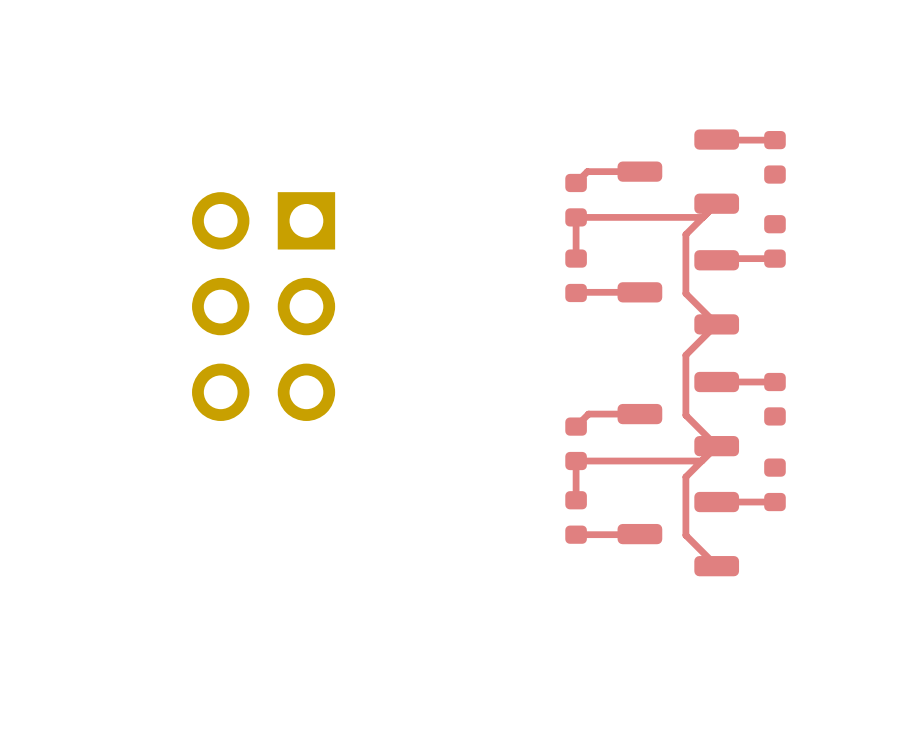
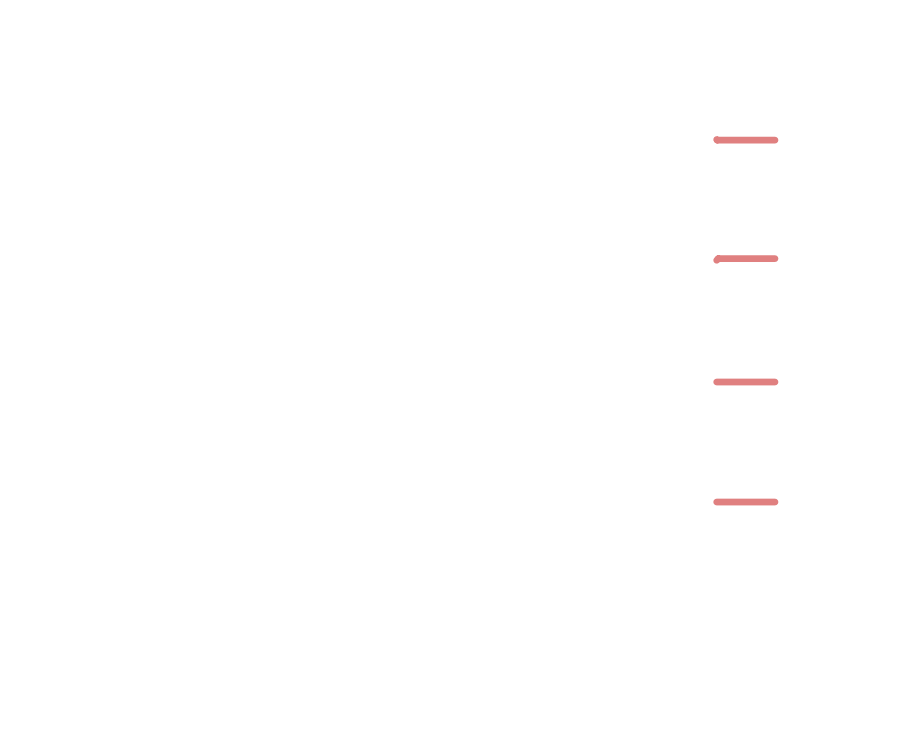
part: (774, 157) -> none
top track: (639, 171) (587, 171) (576, 182) -> none
part: (678, 171) -> none
part: (576, 200) -> none
top track: (716, 203) (685, 234) (685, 293) (716, 324) (685, 355) (685, 415) (716, 446) (685, 476) (685, 535) (716, 566) -> none
top track: (702, 217) (576, 217) (576, 258) -> none
part: (774, 241) -> none
part: (576, 275) -> none
top track: (639, 292) (576, 292) -> none
part: (678, 292) -> none
part: (263, 306) -> none
part: (774, 399) -> none
top track: (639, 414) (588, 414) (576, 426) -> none
part: (678, 414) -> none
part: (576, 443) -> none
top track: (701, 461) (576, 461) (576, 500) -> none
part: (774, 484) -> none
part: (576, 517) -> none
top track: (639, 534) (576, 534) -> none
part: (678, 534) -> none

